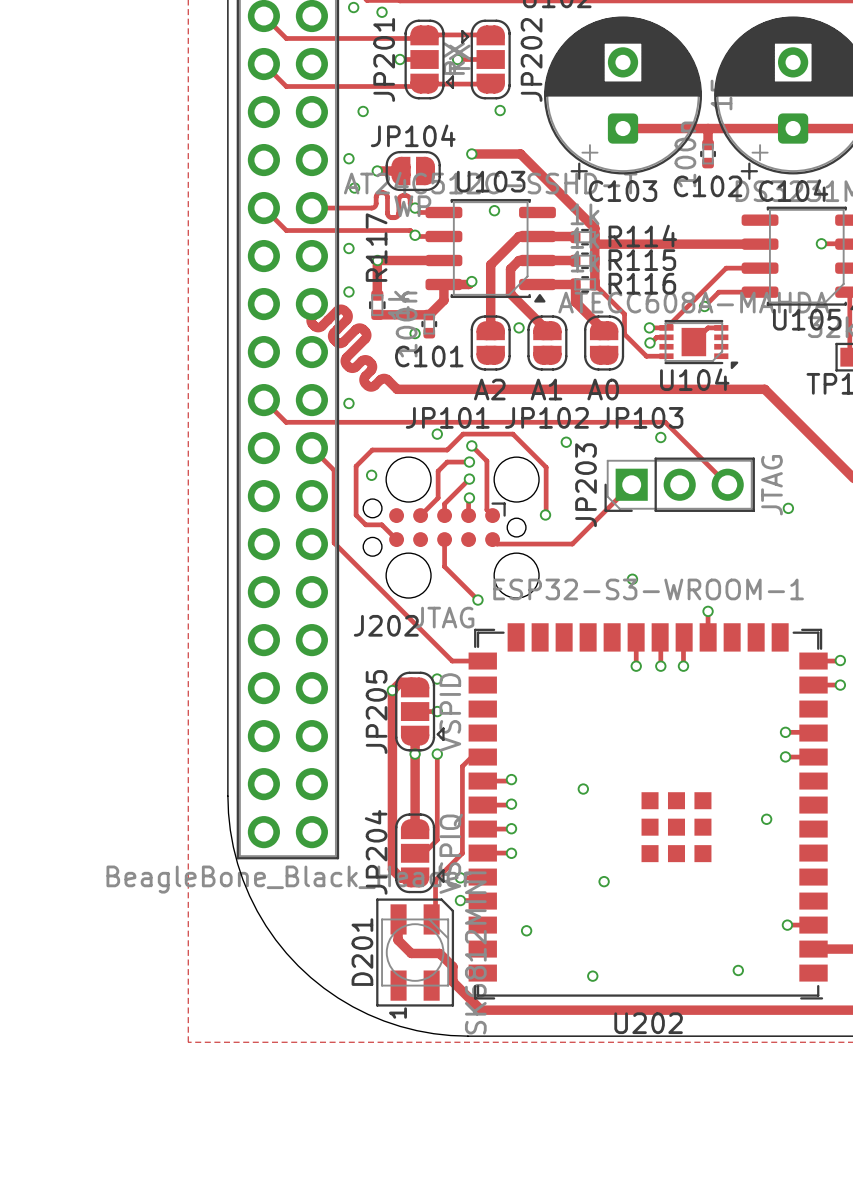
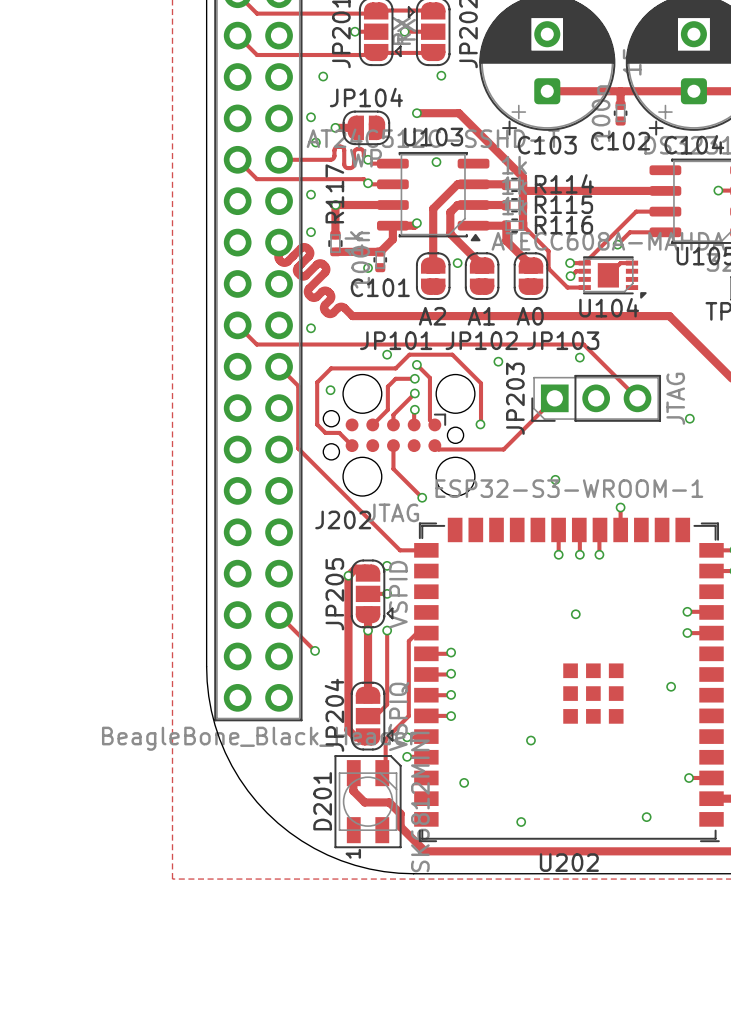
track: none -> (279, 615) (314, 650)
via: none -> (315, 650)
via position: (583, 789) -> (575, 614)

